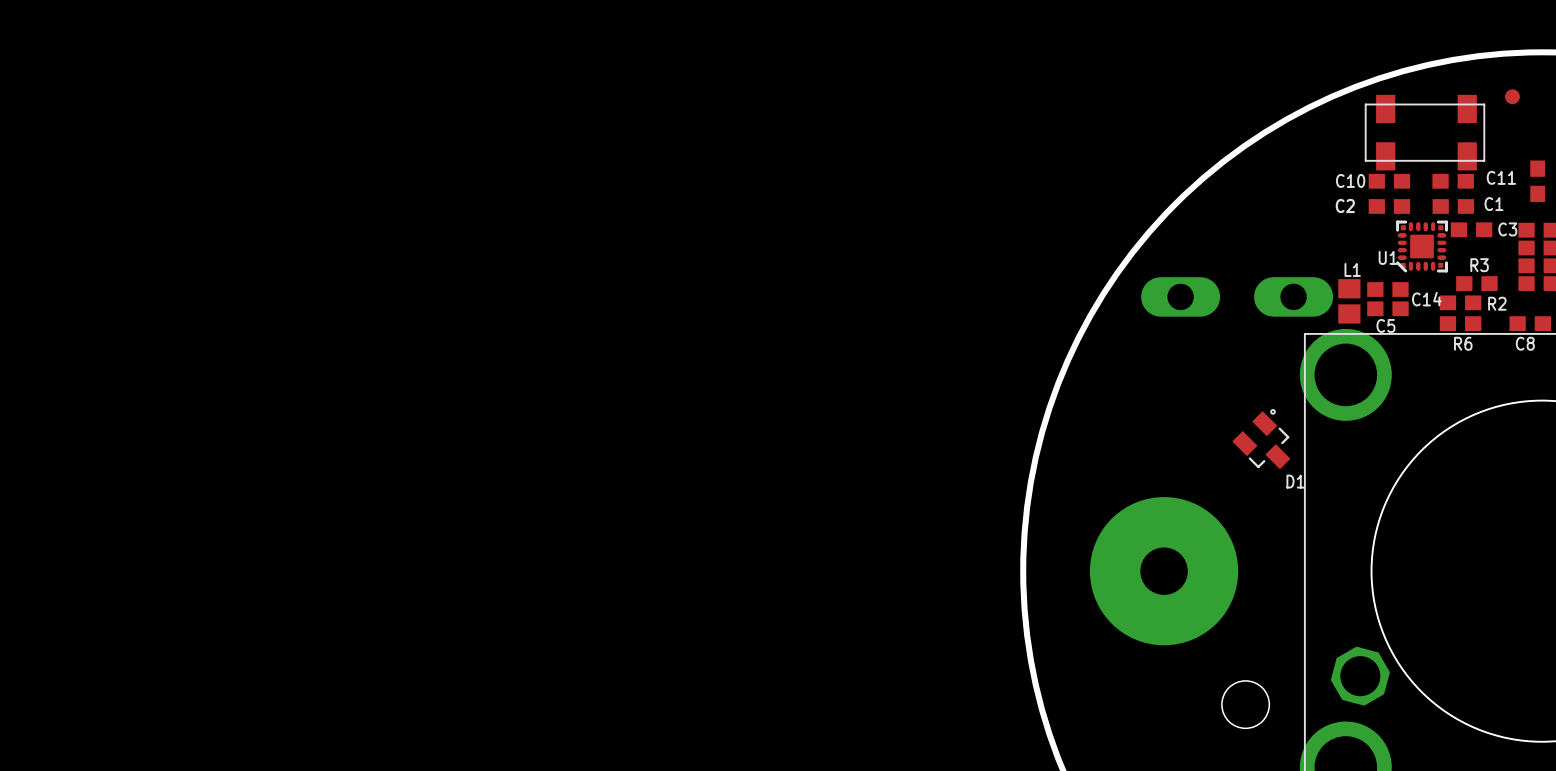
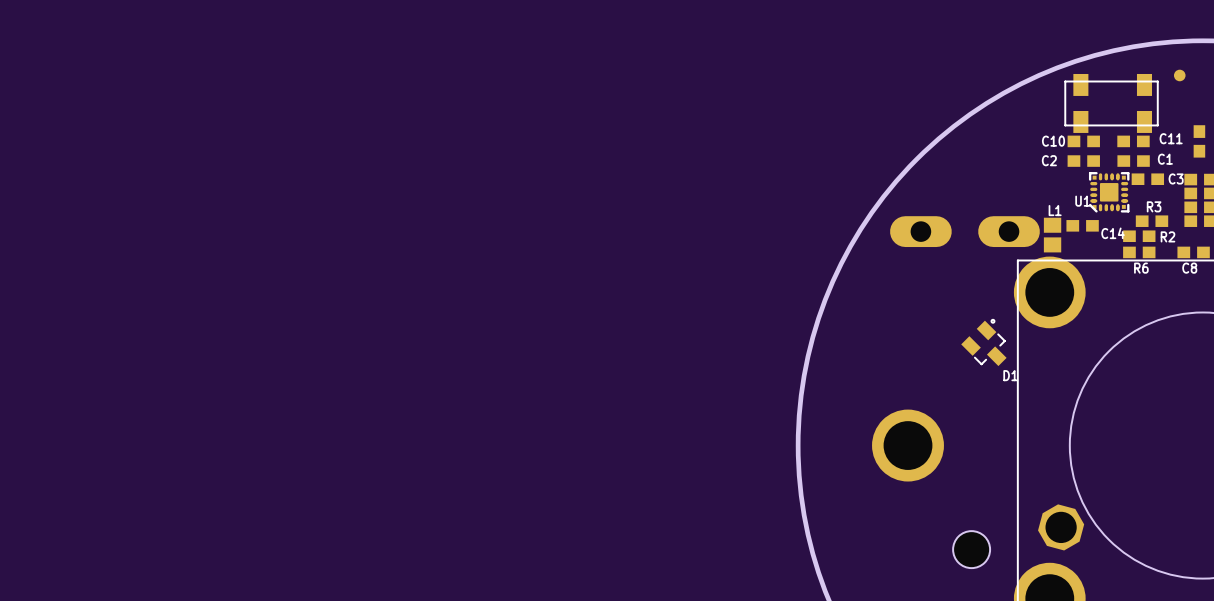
C5: (1387, 308) -> none
part footprint: [1089, 497, 1239, 646] -> [872, 409, 944, 482]

